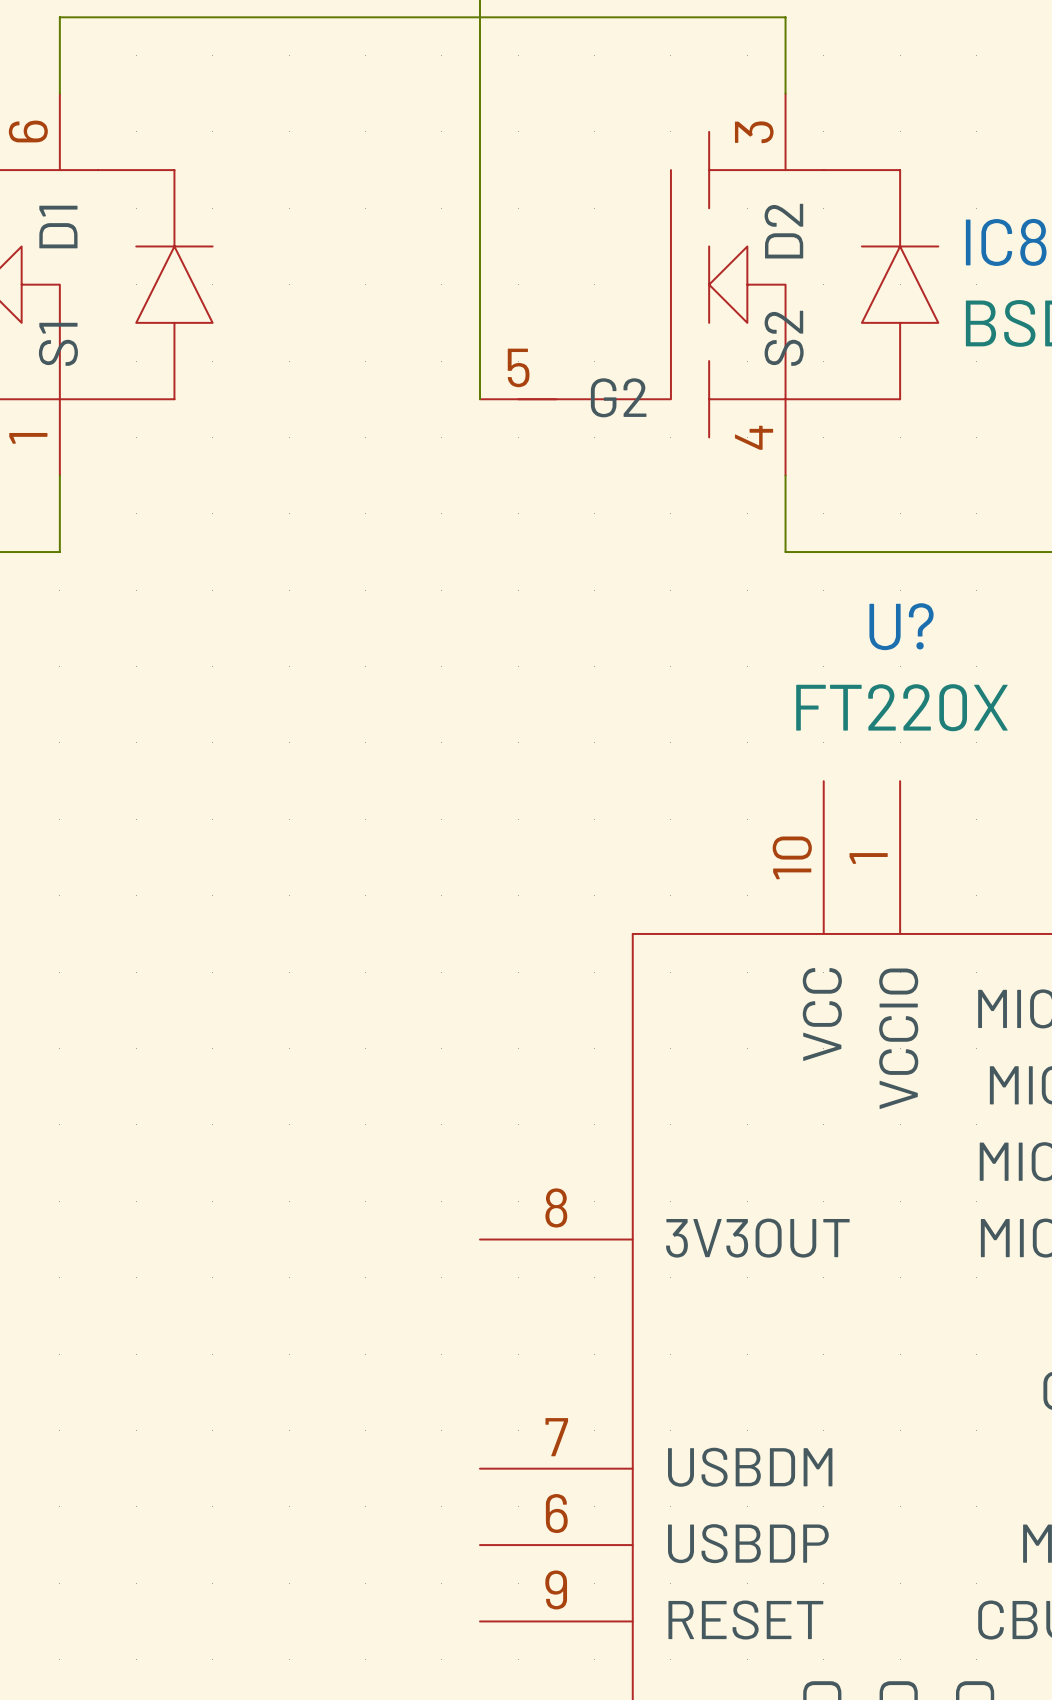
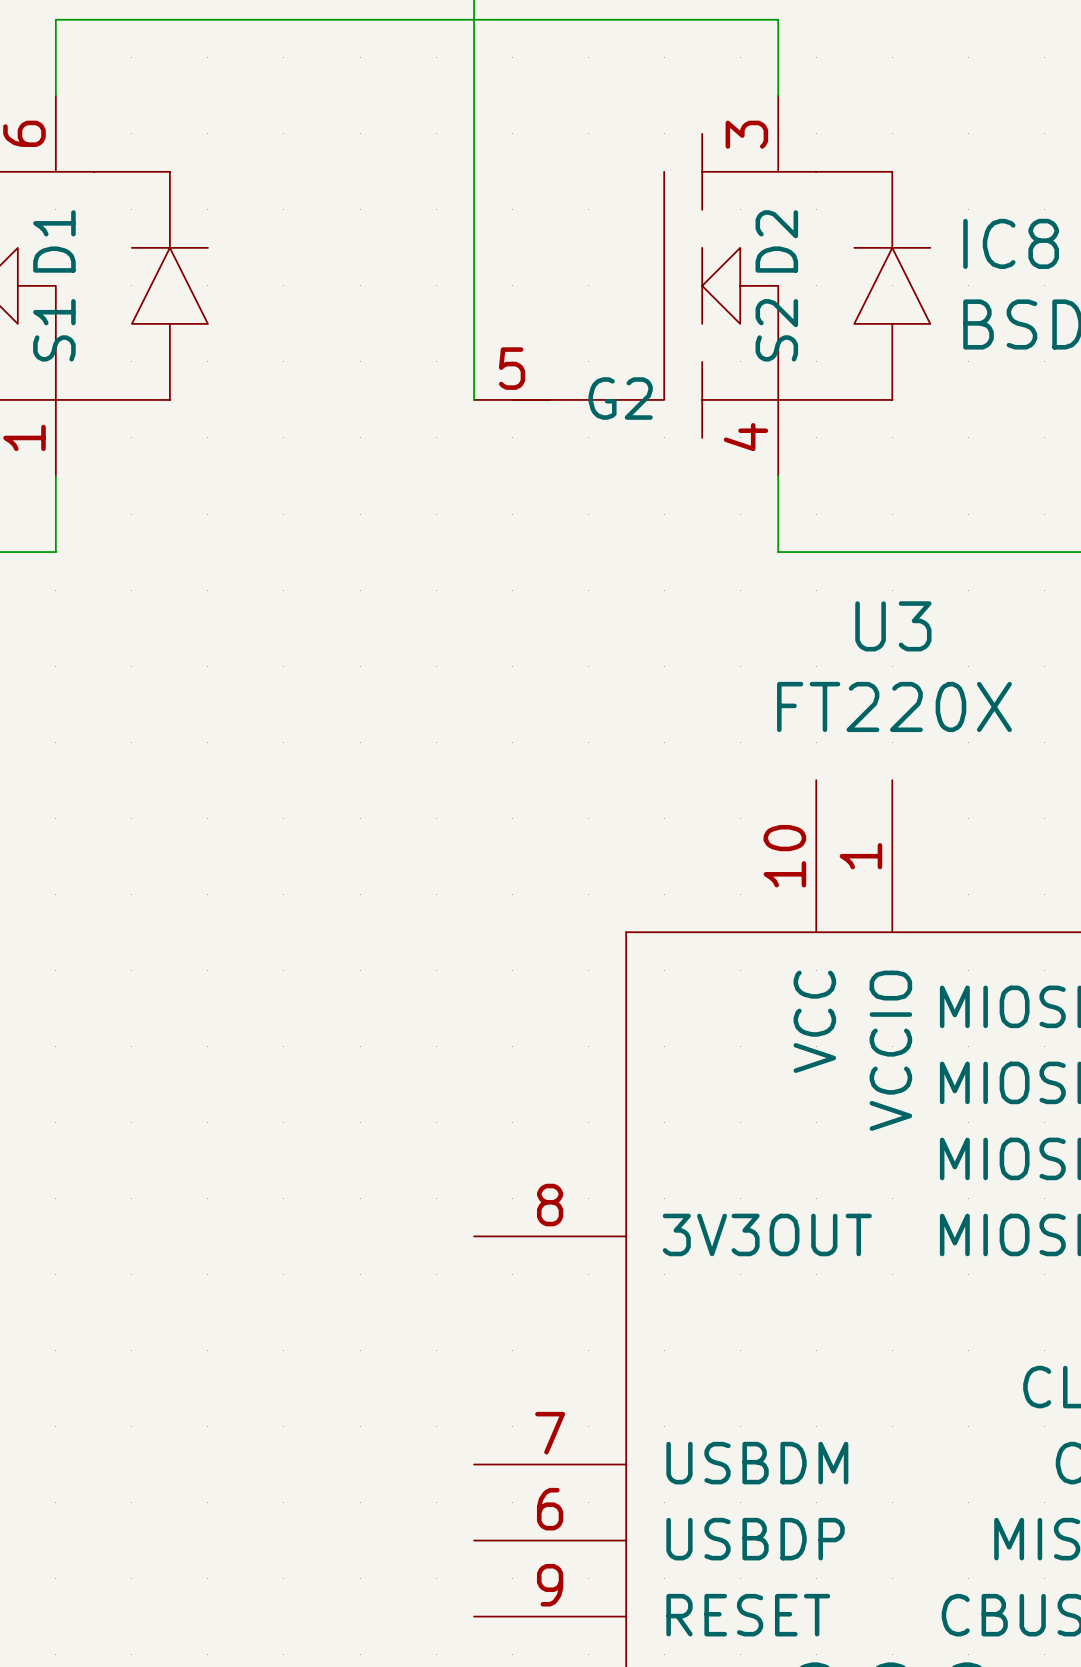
U? name: U? (901, 626) -> U3 (893, 626)

